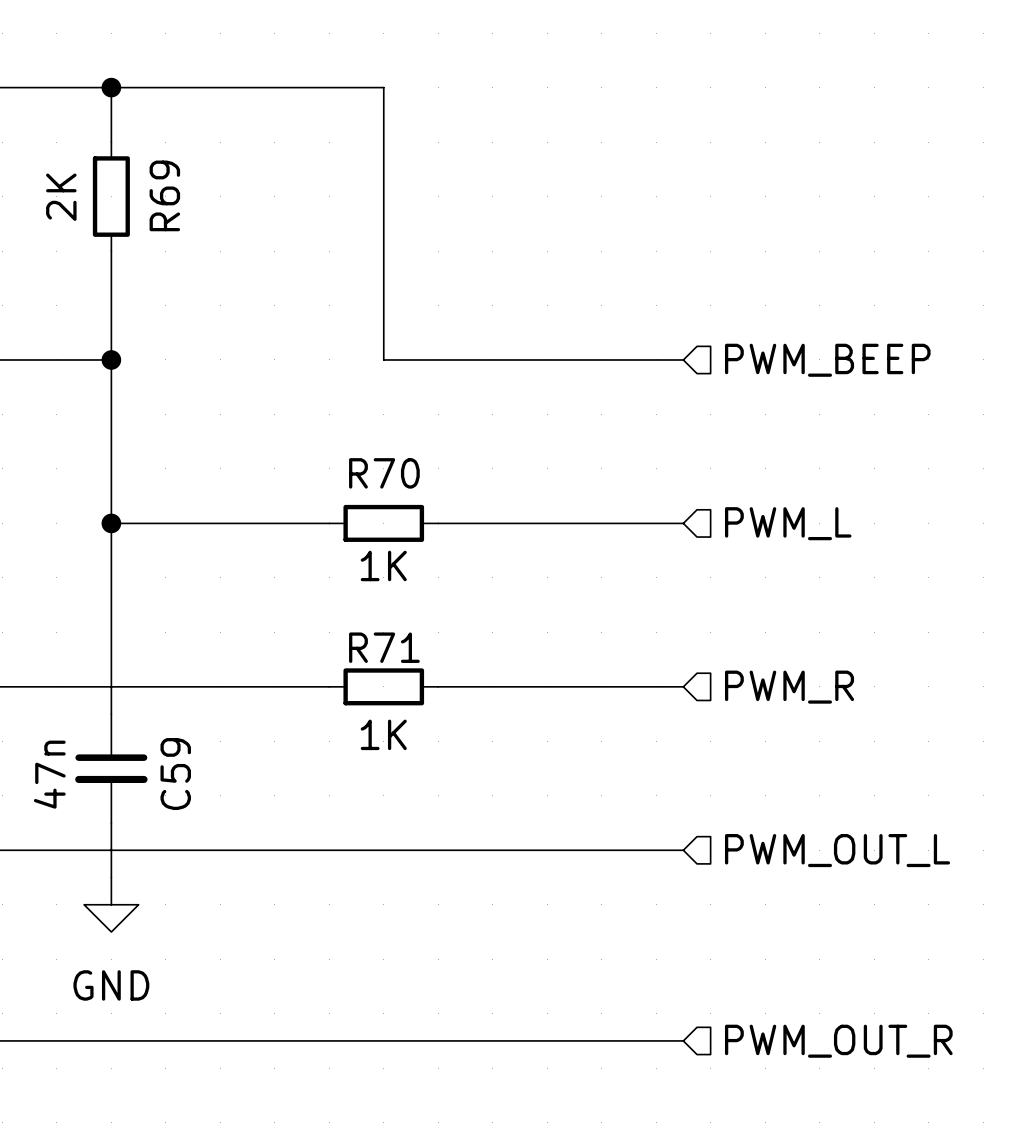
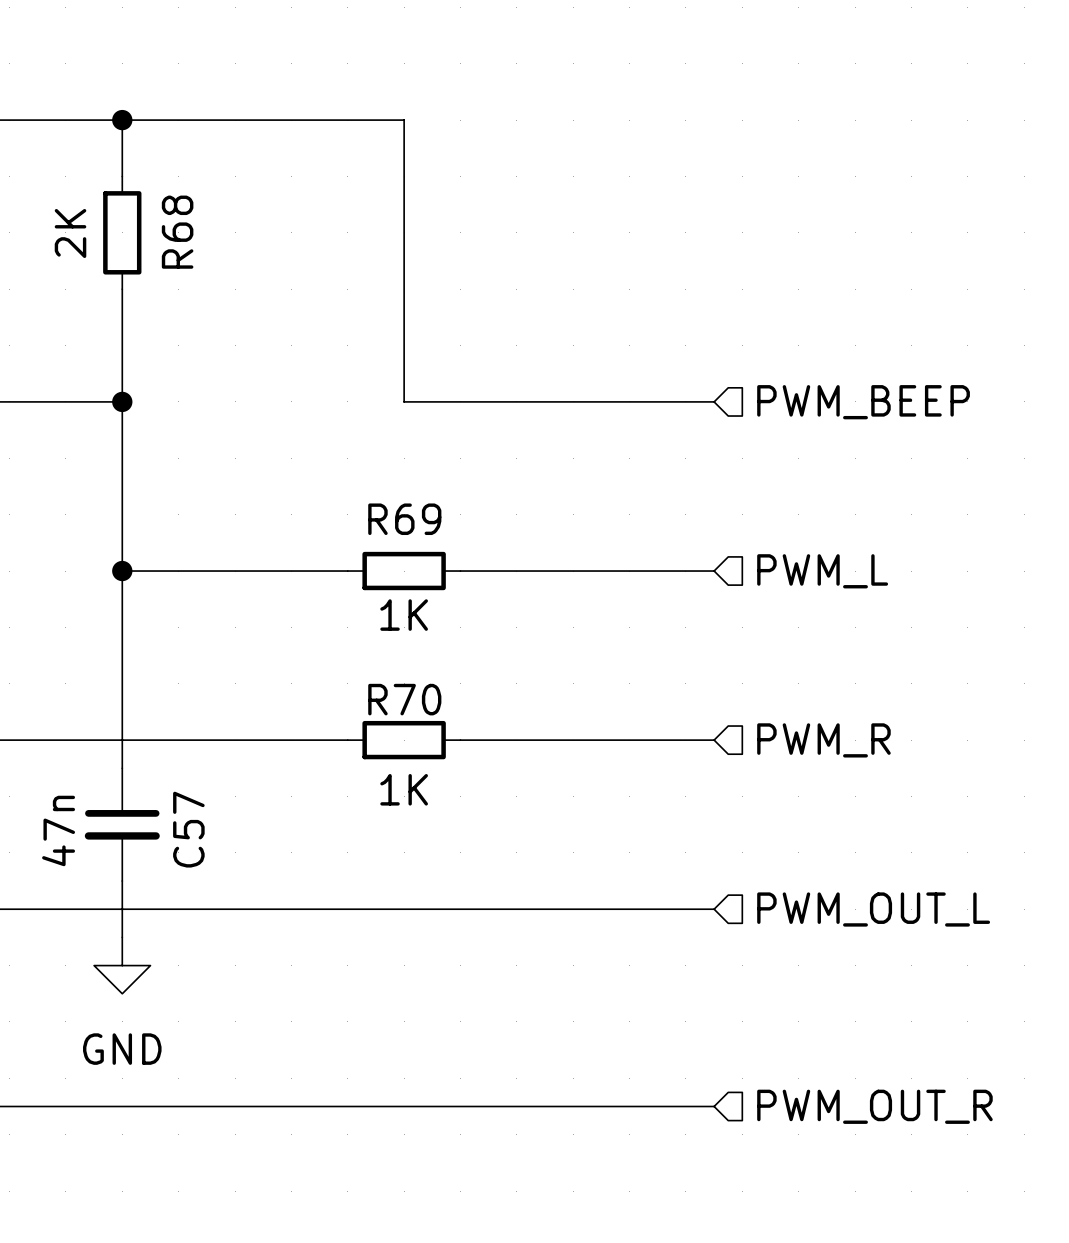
R69 name: R69 (164, 195) -> R68 (177, 232)
R70 name: R70 (384, 473) -> R69 (404, 519)
R71 name: R71 (384, 647) -> R70 (404, 699)
C59 name: C59 (175, 774) -> C57 (188, 829)

